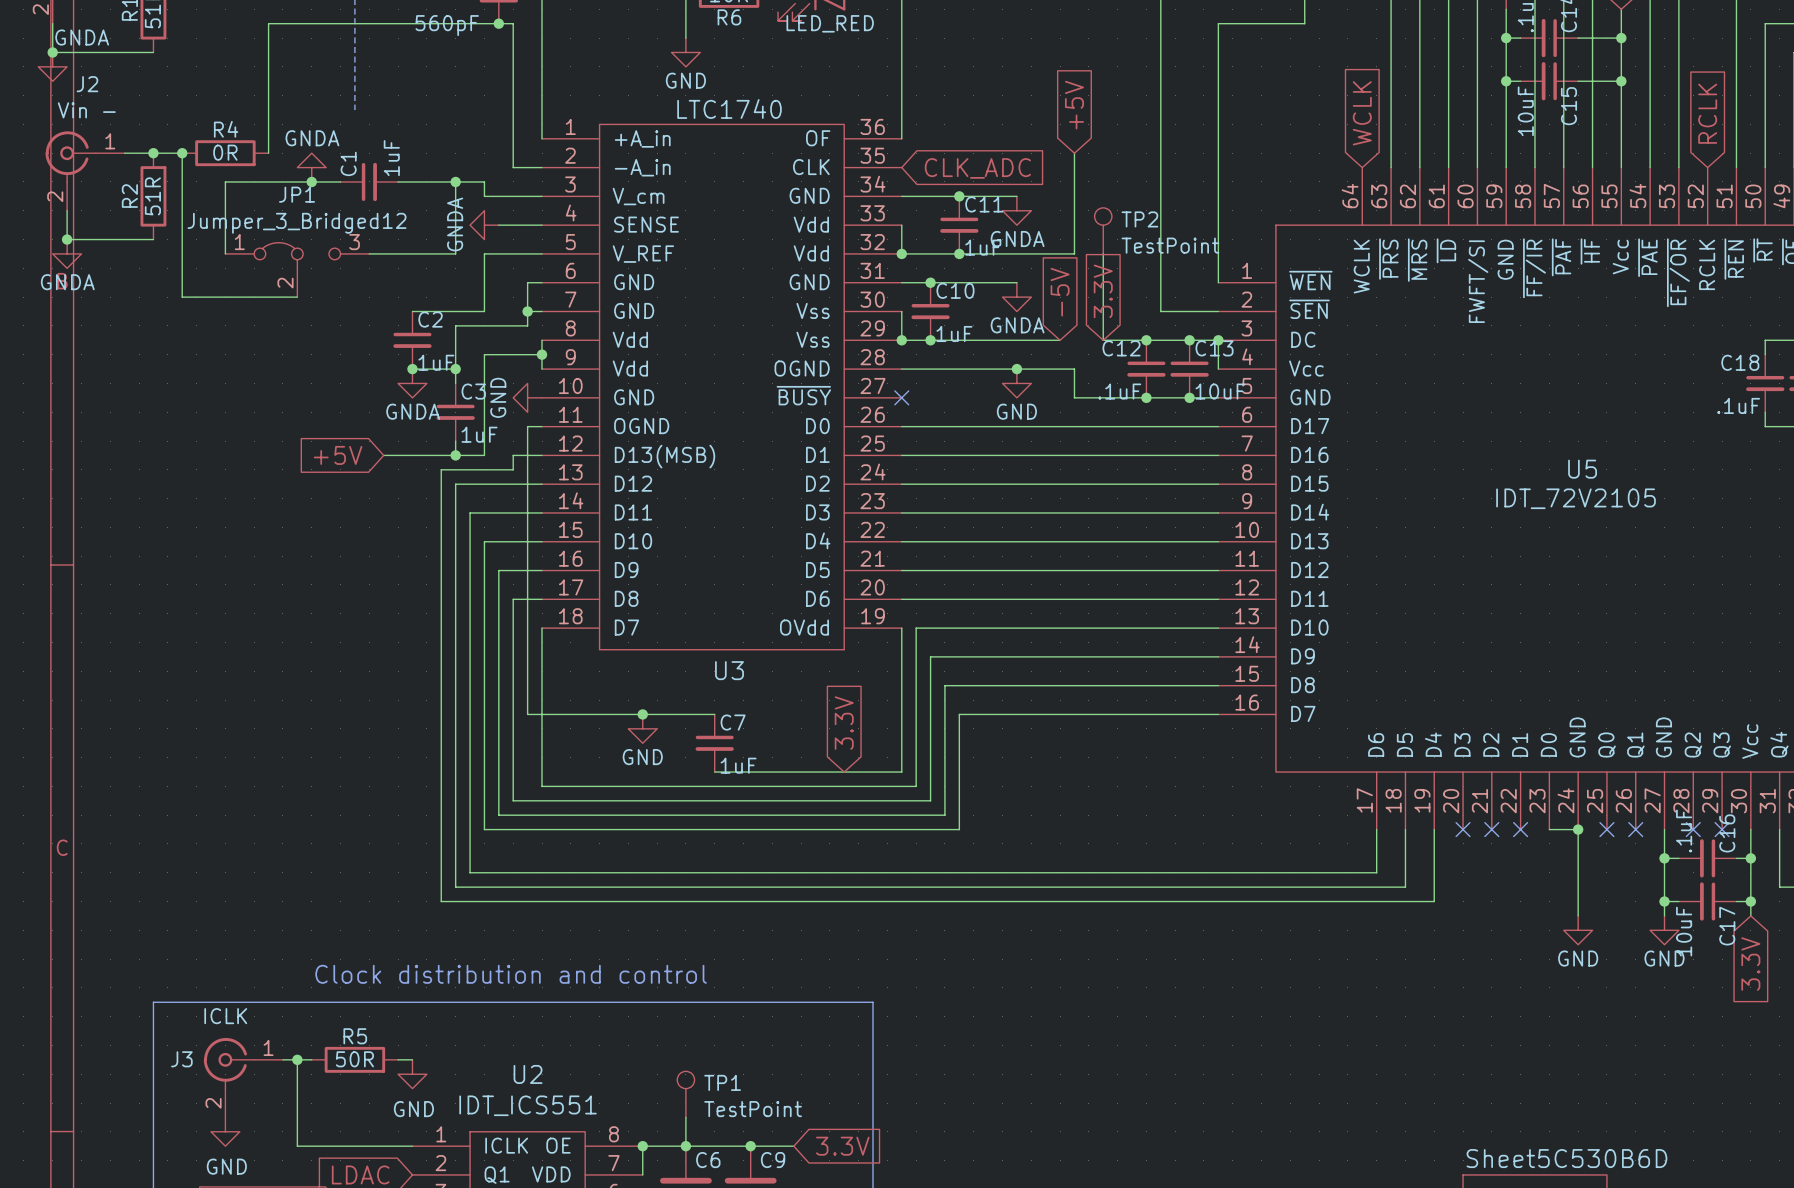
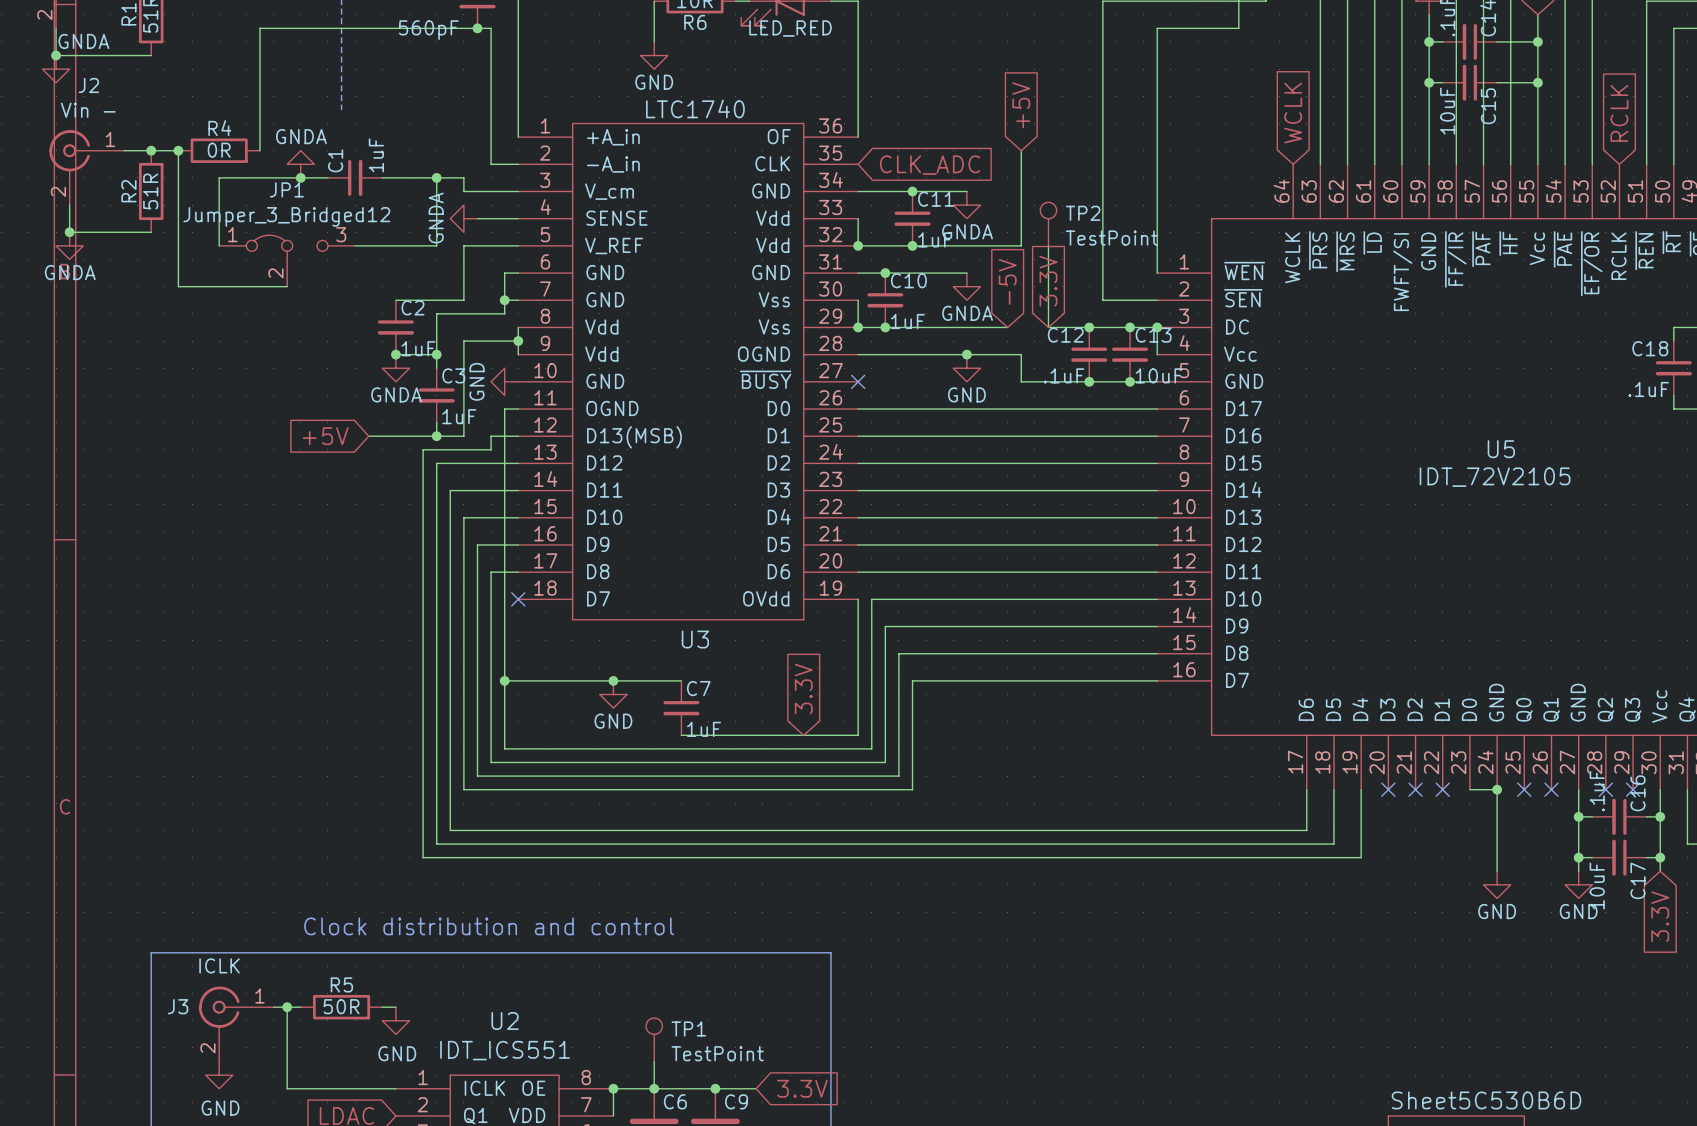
wire: (542, 628) (542, 786) -> (504, 680) (504, 748) (518, 748)
no-connect mark: none -> (518, 599)
junction: none -> (504, 680)

